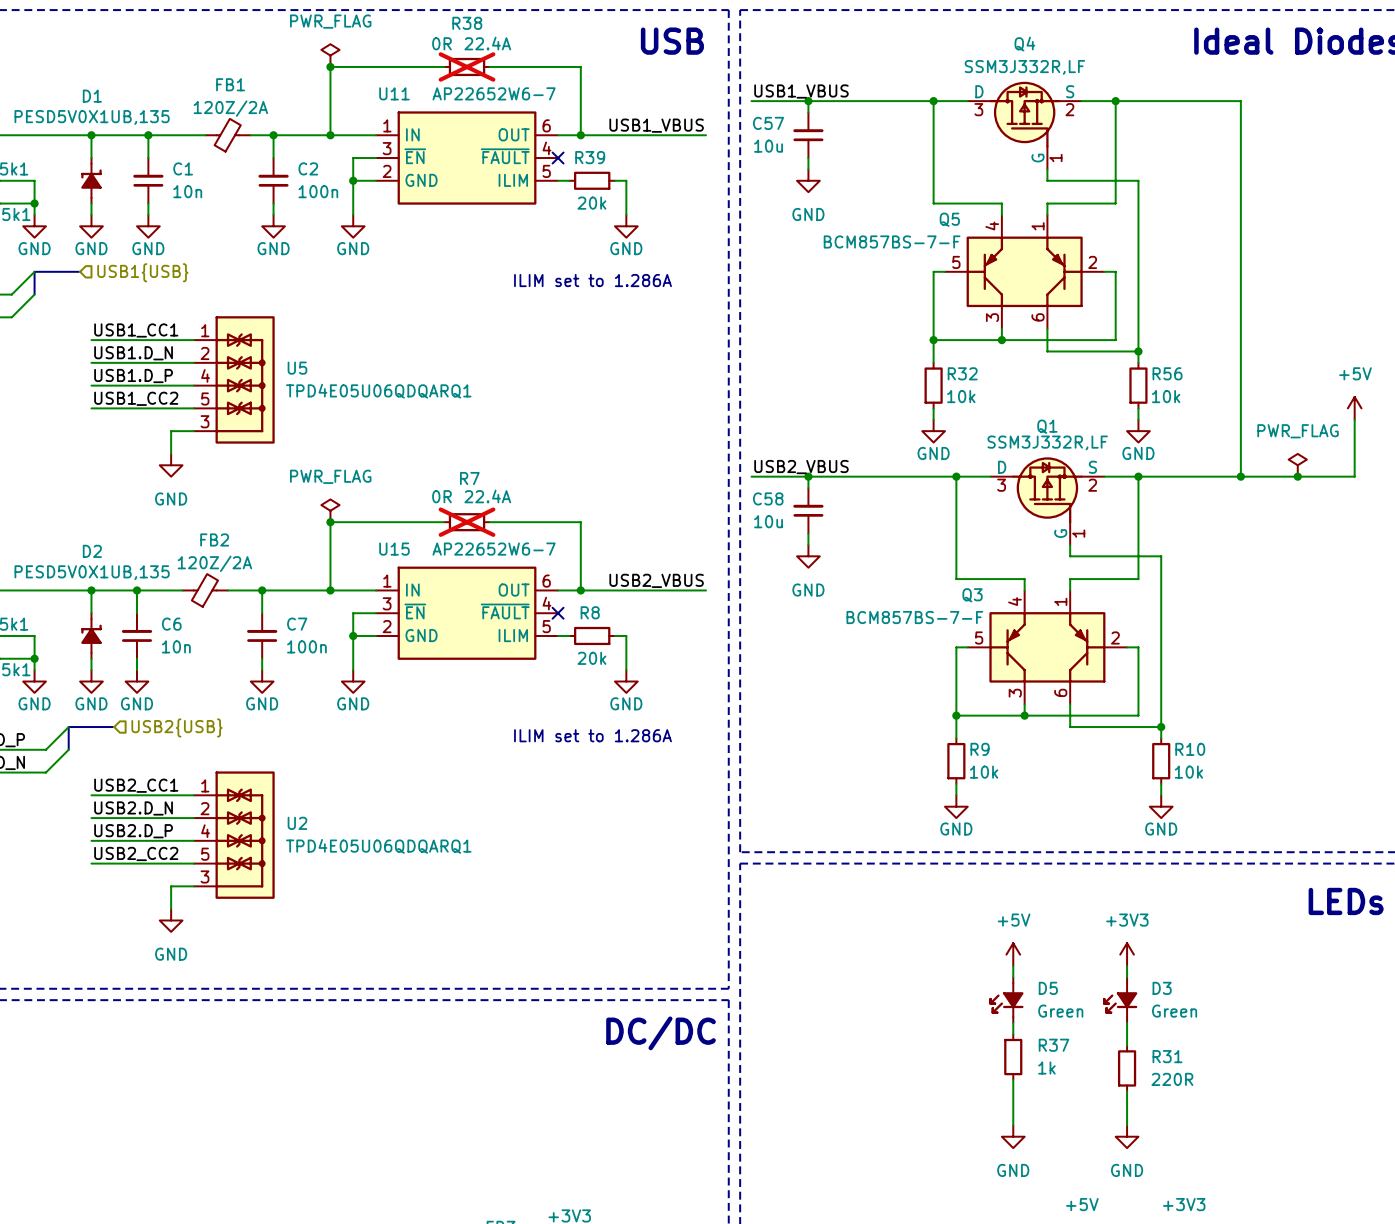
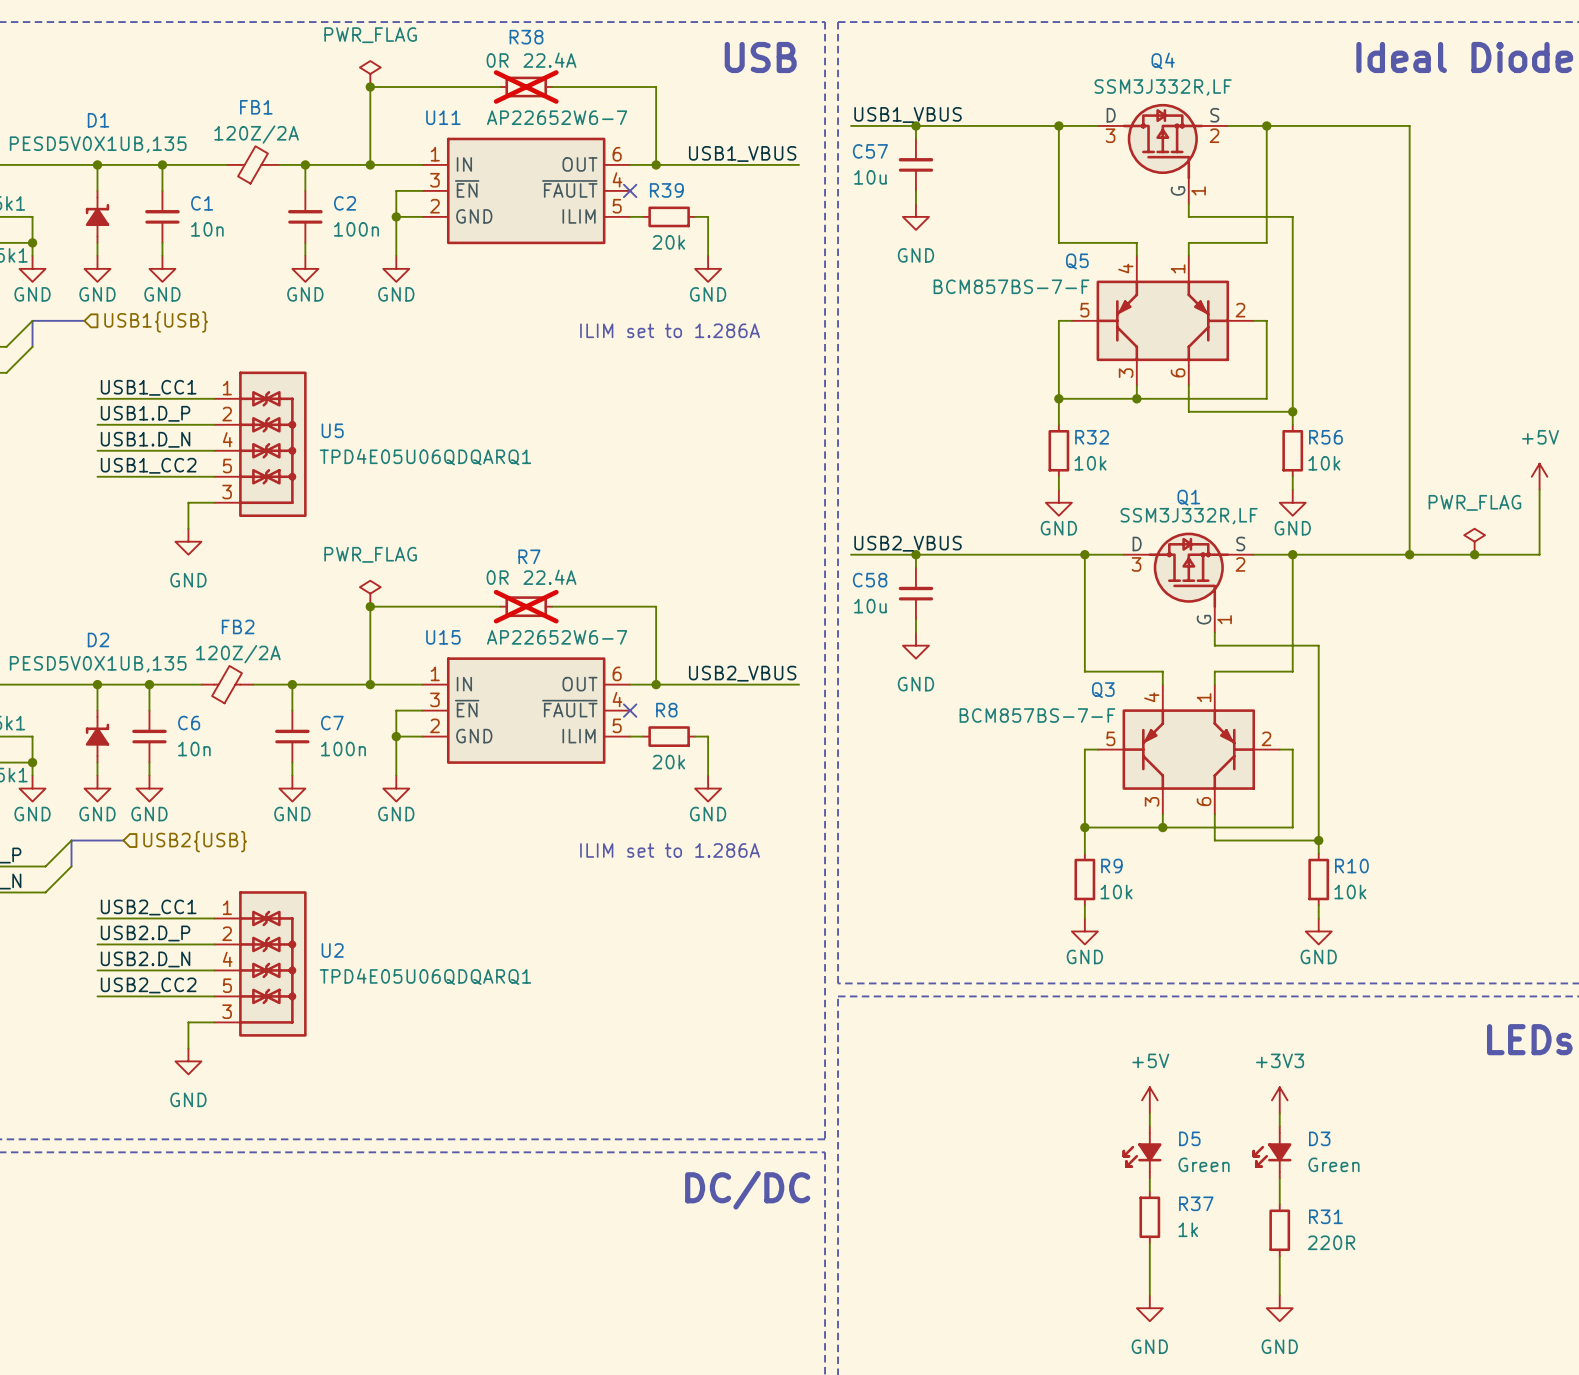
label: USB1.D_N (133, 353) -> USB1.D_P (145, 413)
label: USB1.D_P (133, 376) -> USB1.D_N (145, 439)
label: USB2.D_N (133, 808) -> USB2.D_P (145, 933)
label: USB2.D_P (133, 831) -> USB2.D_N (145, 959)

